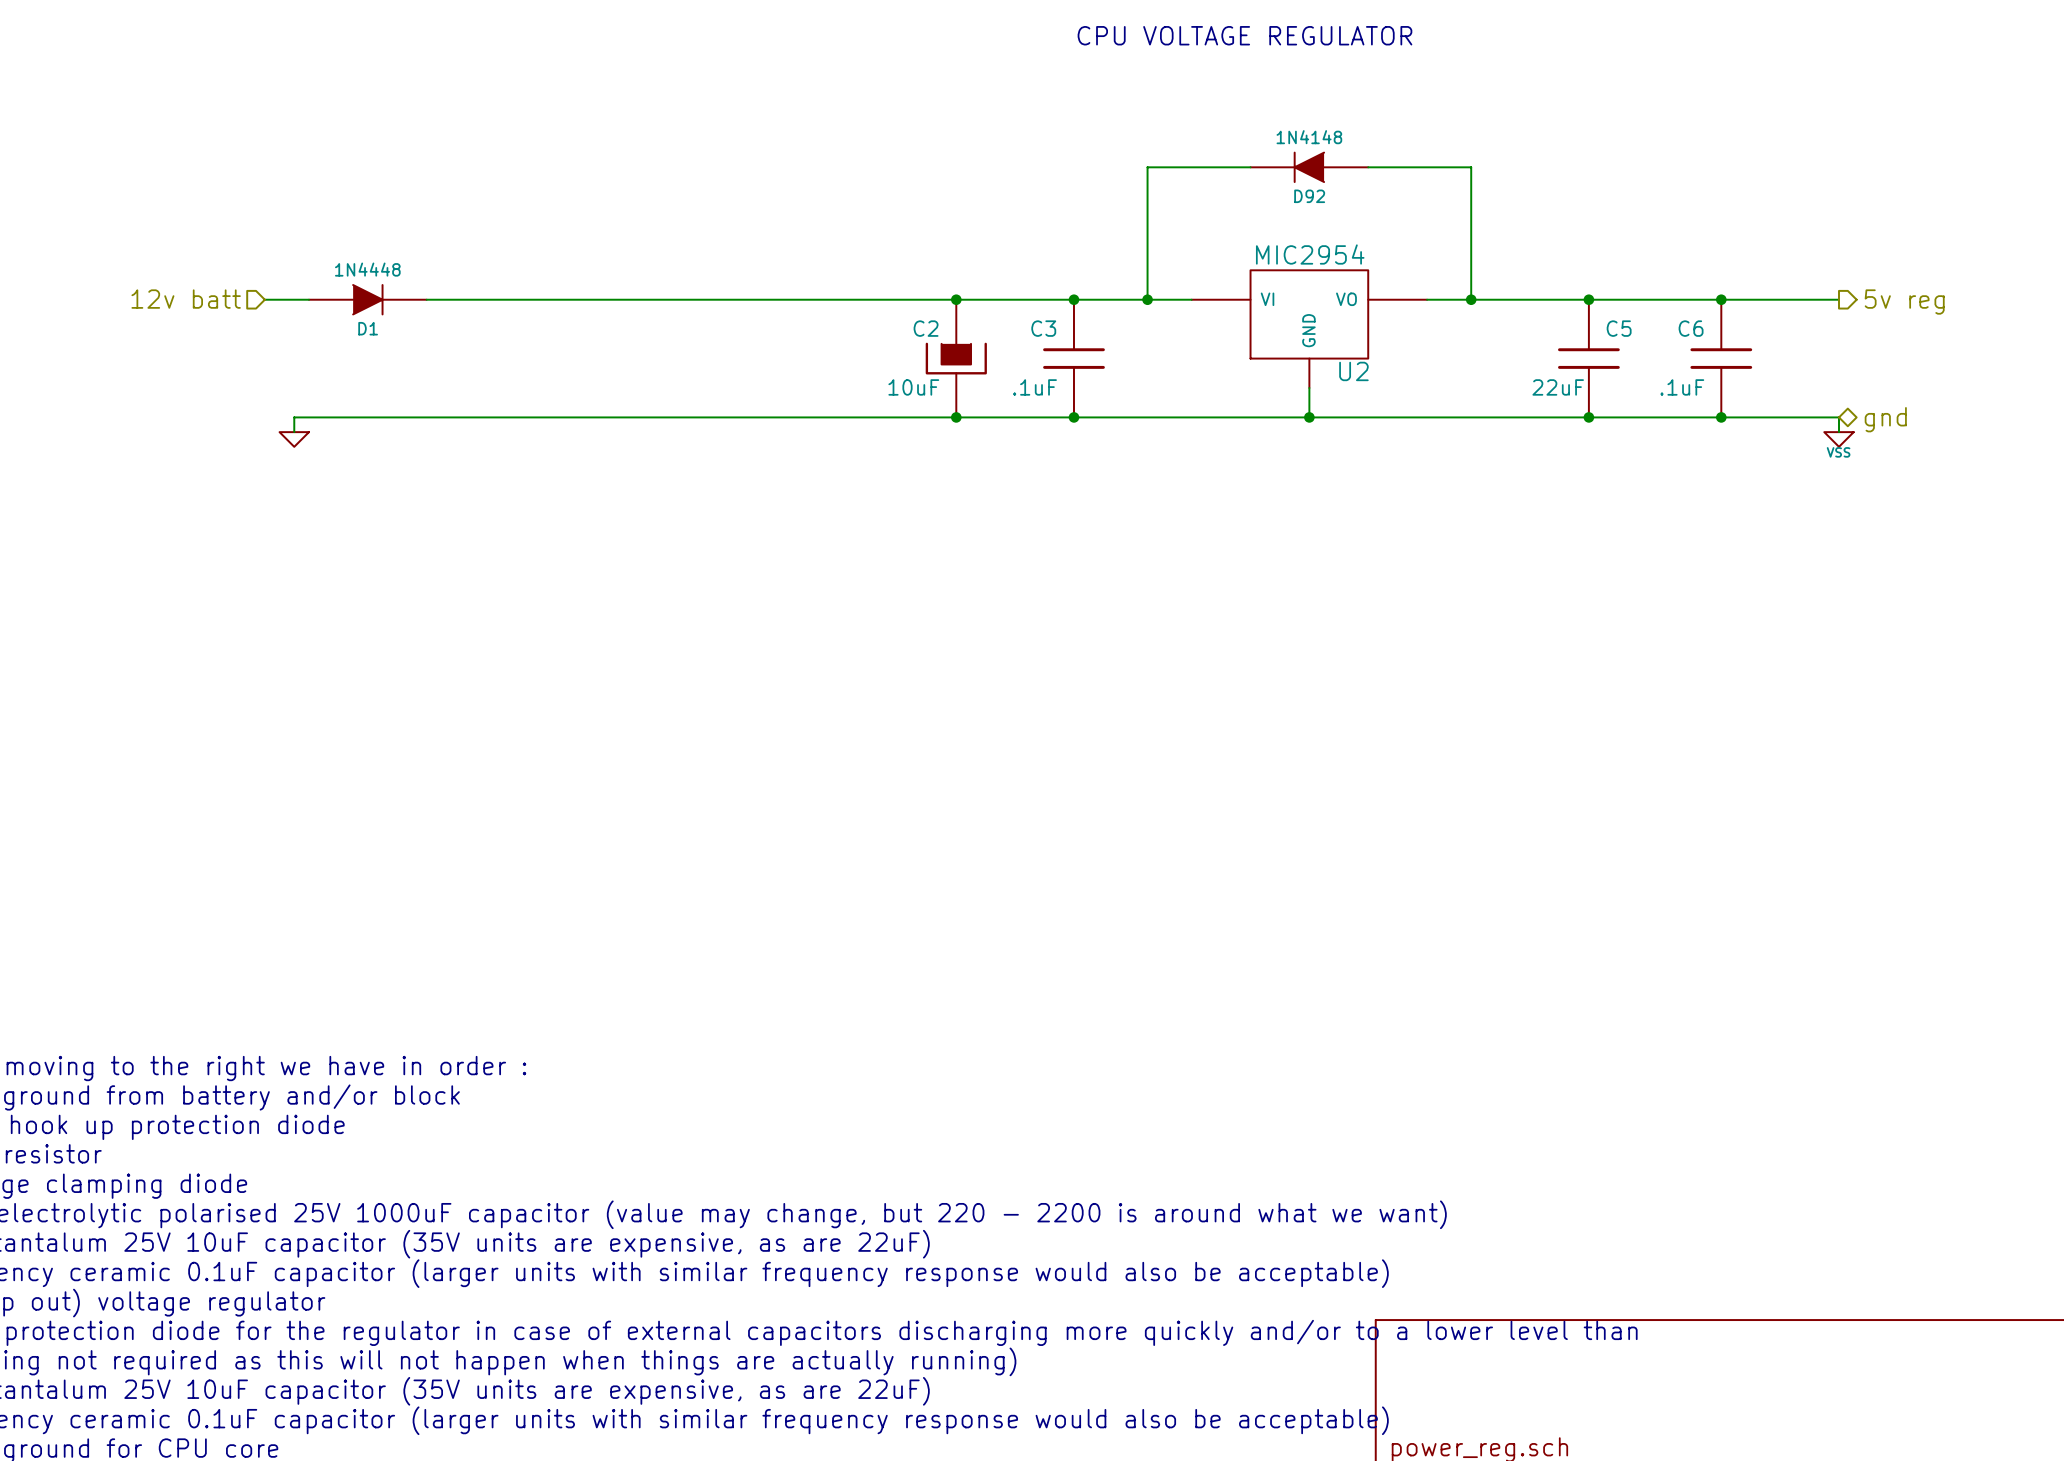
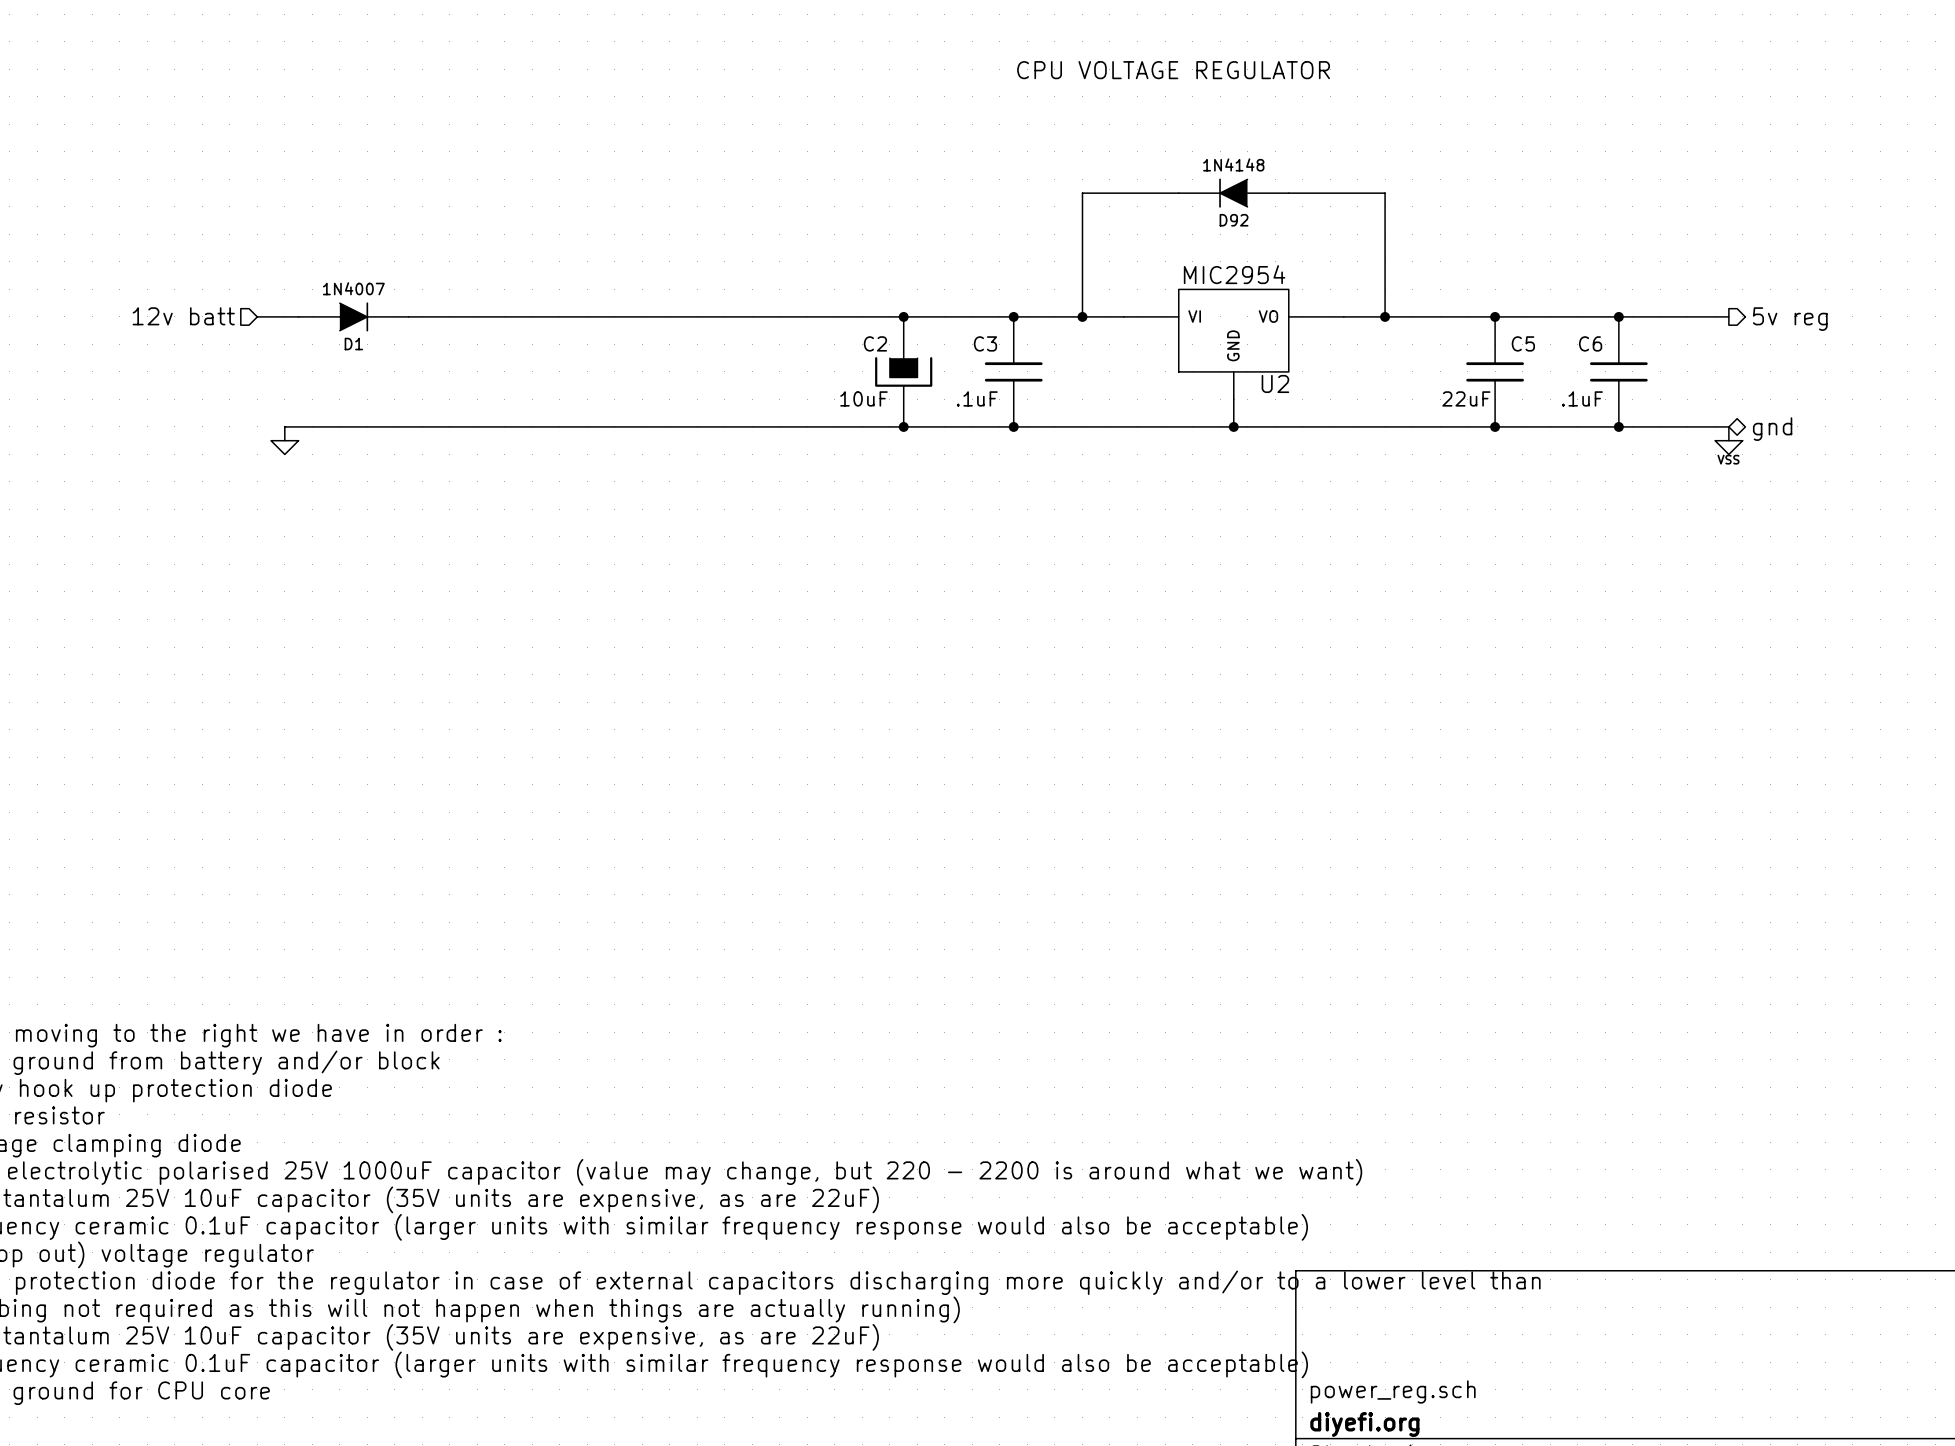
D1 value: 1N4448 (367, 269) -> 1N4007 (353, 288)

